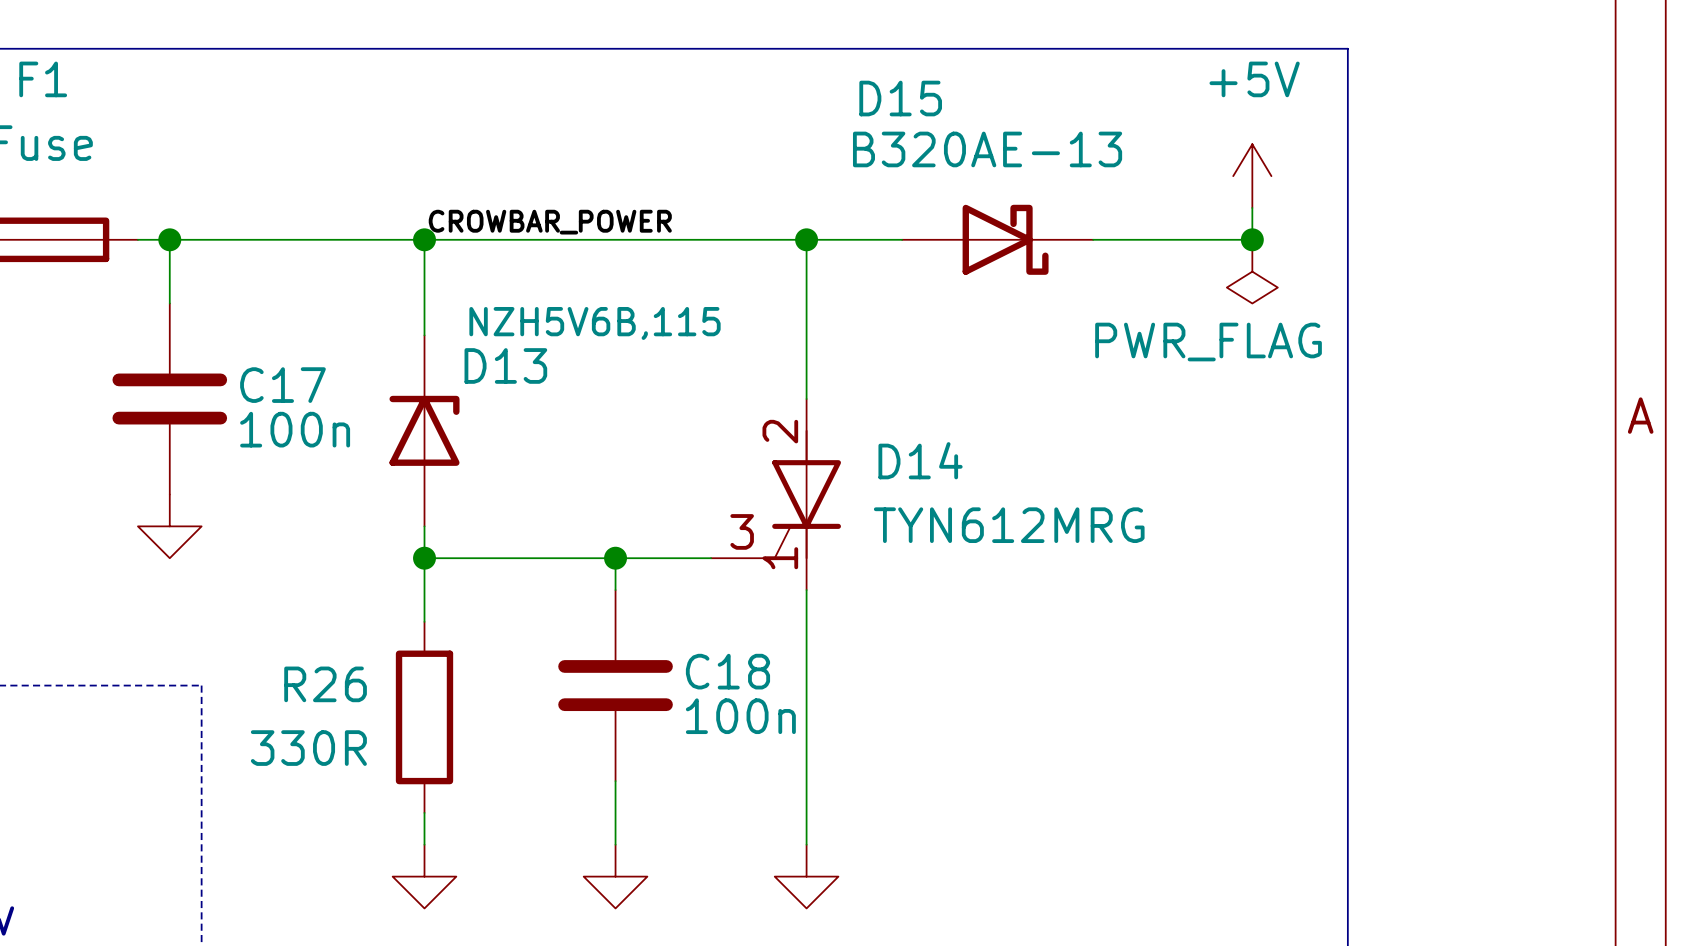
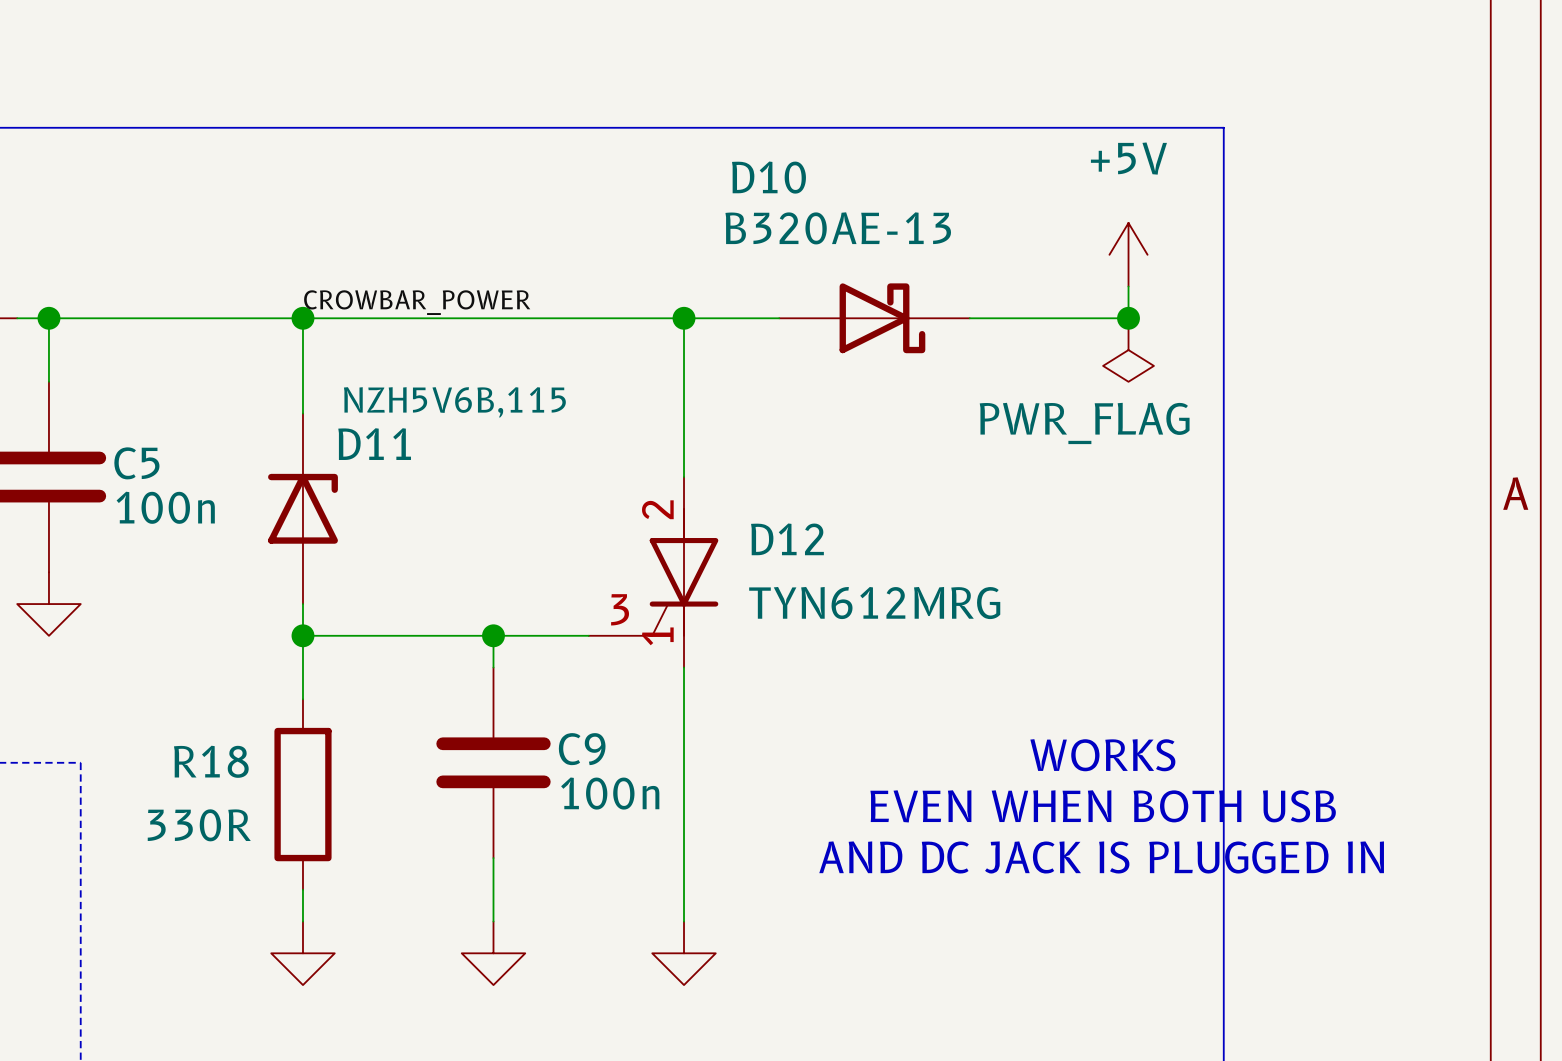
D15 name: D15 (900, 98) -> D10 (768, 177)
D13 name: D13 (505, 365) -> D11 (374, 444)
C17 name: C17 (282, 385) -> C5 (136, 463)
D14 name: D14 (920, 460) -> D12 (787, 539)
C18 name: C18 (727, 671) -> C9 (582, 749)
text: none -> WORKS (1102, 755)
R26 name: R26 (325, 684) -> R18 (211, 761)
text: none -> EVEN WHEN BOTH USB (1103, 806)
text: none -> AND DC JACK IS PLUGGED IN (1101, 857)

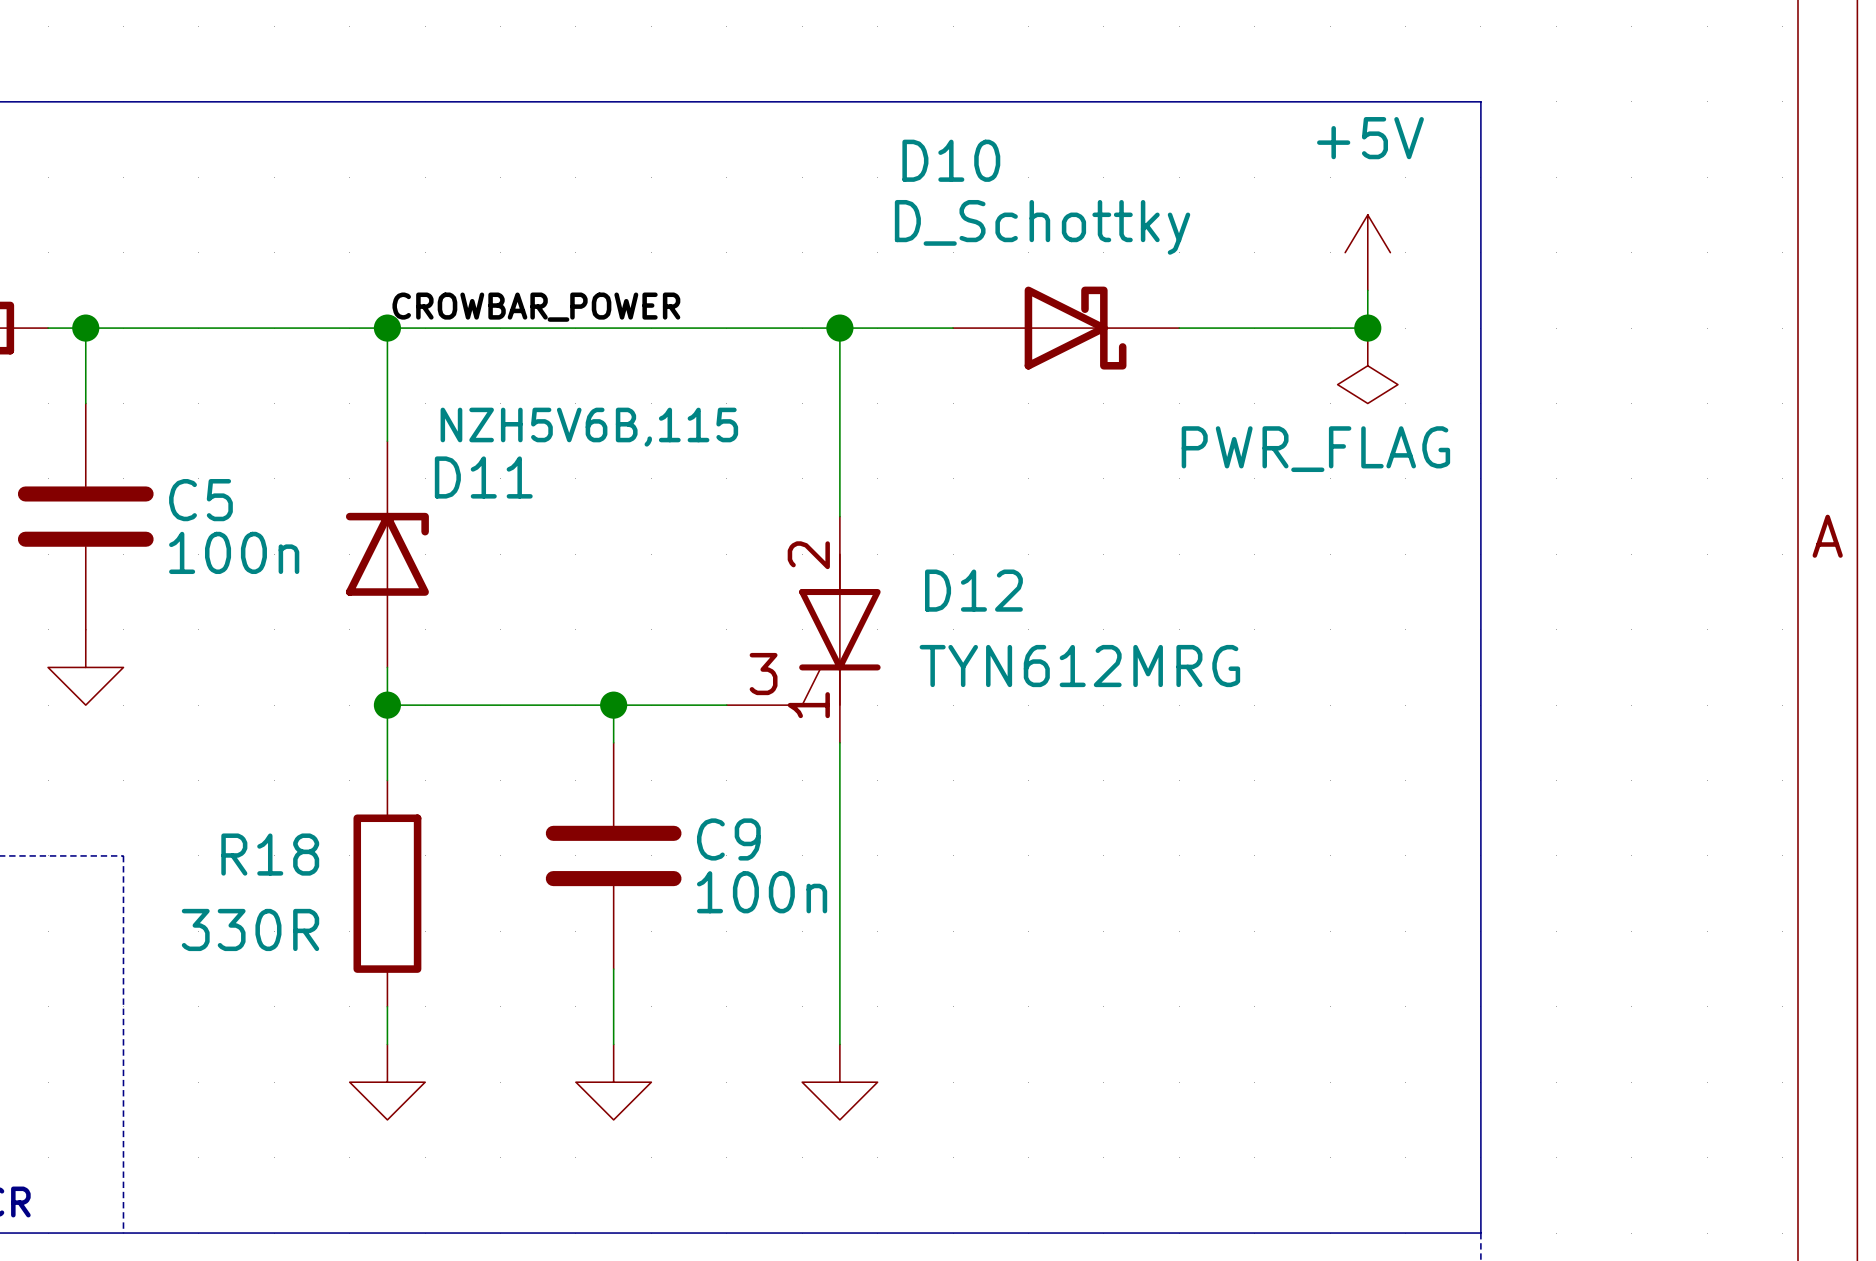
D10 value: B320AE-13 (838, 228) -> D_Schottky (1042, 227)
text: WORKS (1102, 755) -> none
text: EVEN WHEN BOTH USB (1103, 806) -> none
text: AND DC JACK IS PLUGGED IN (1101, 857) -> none

